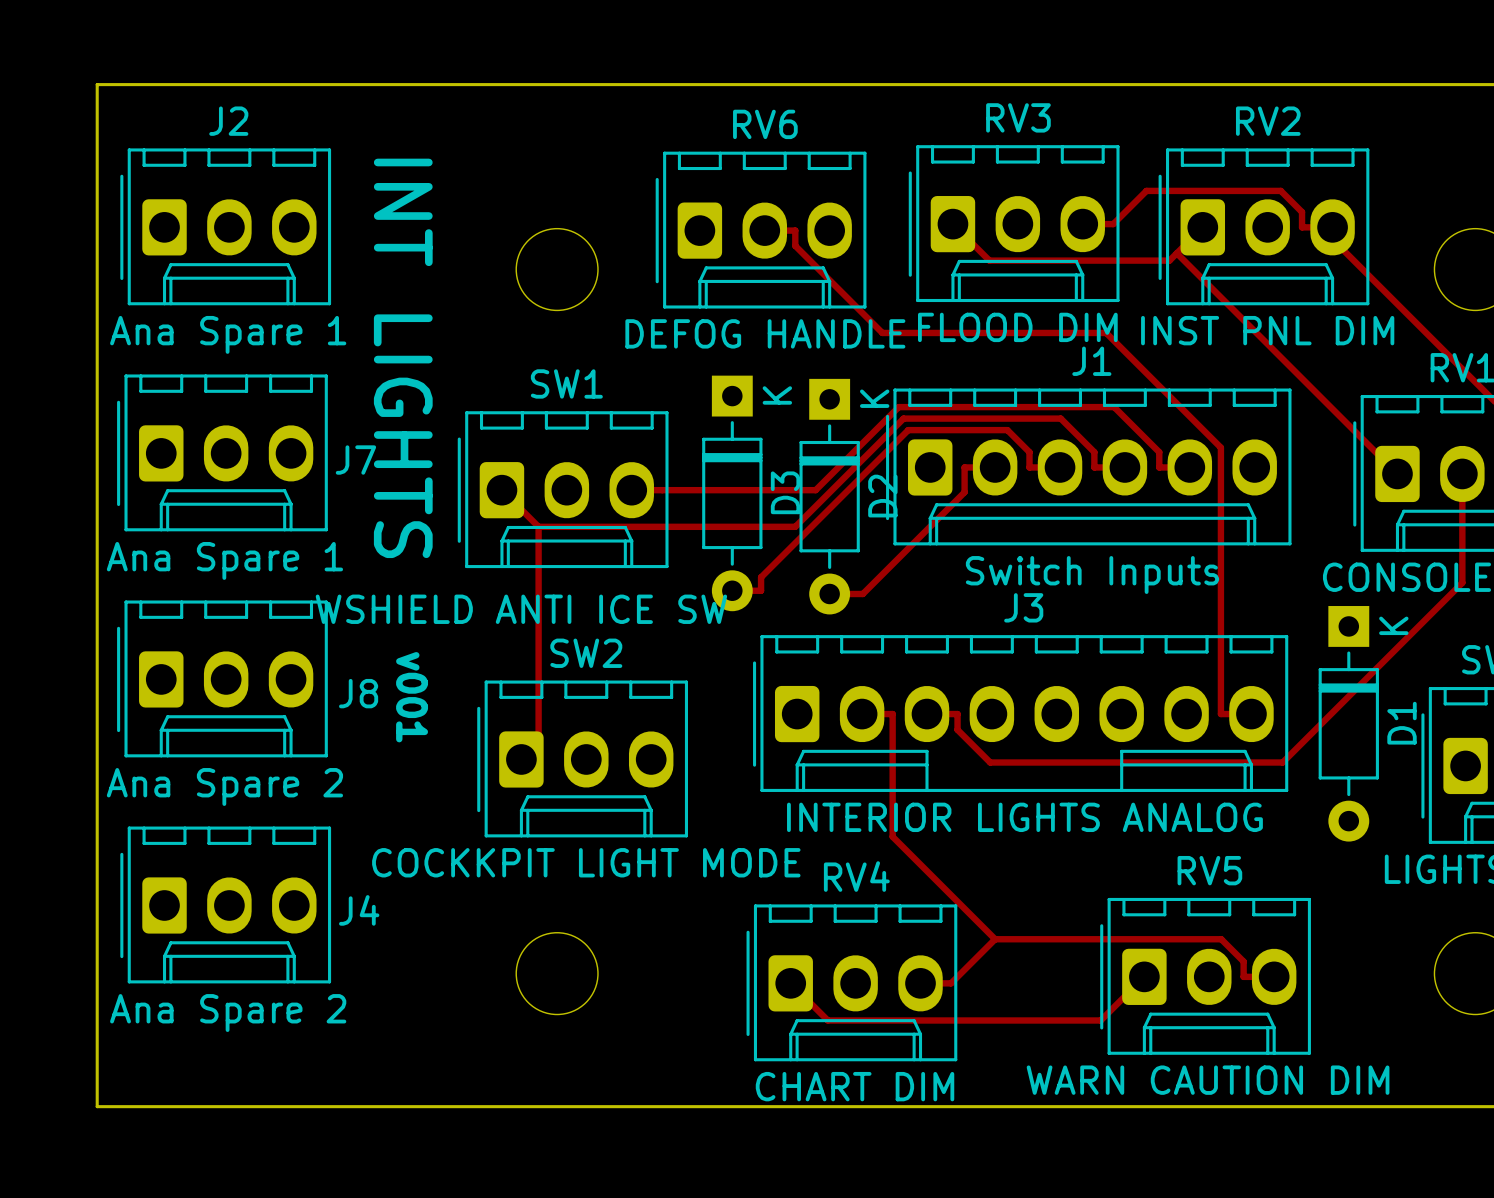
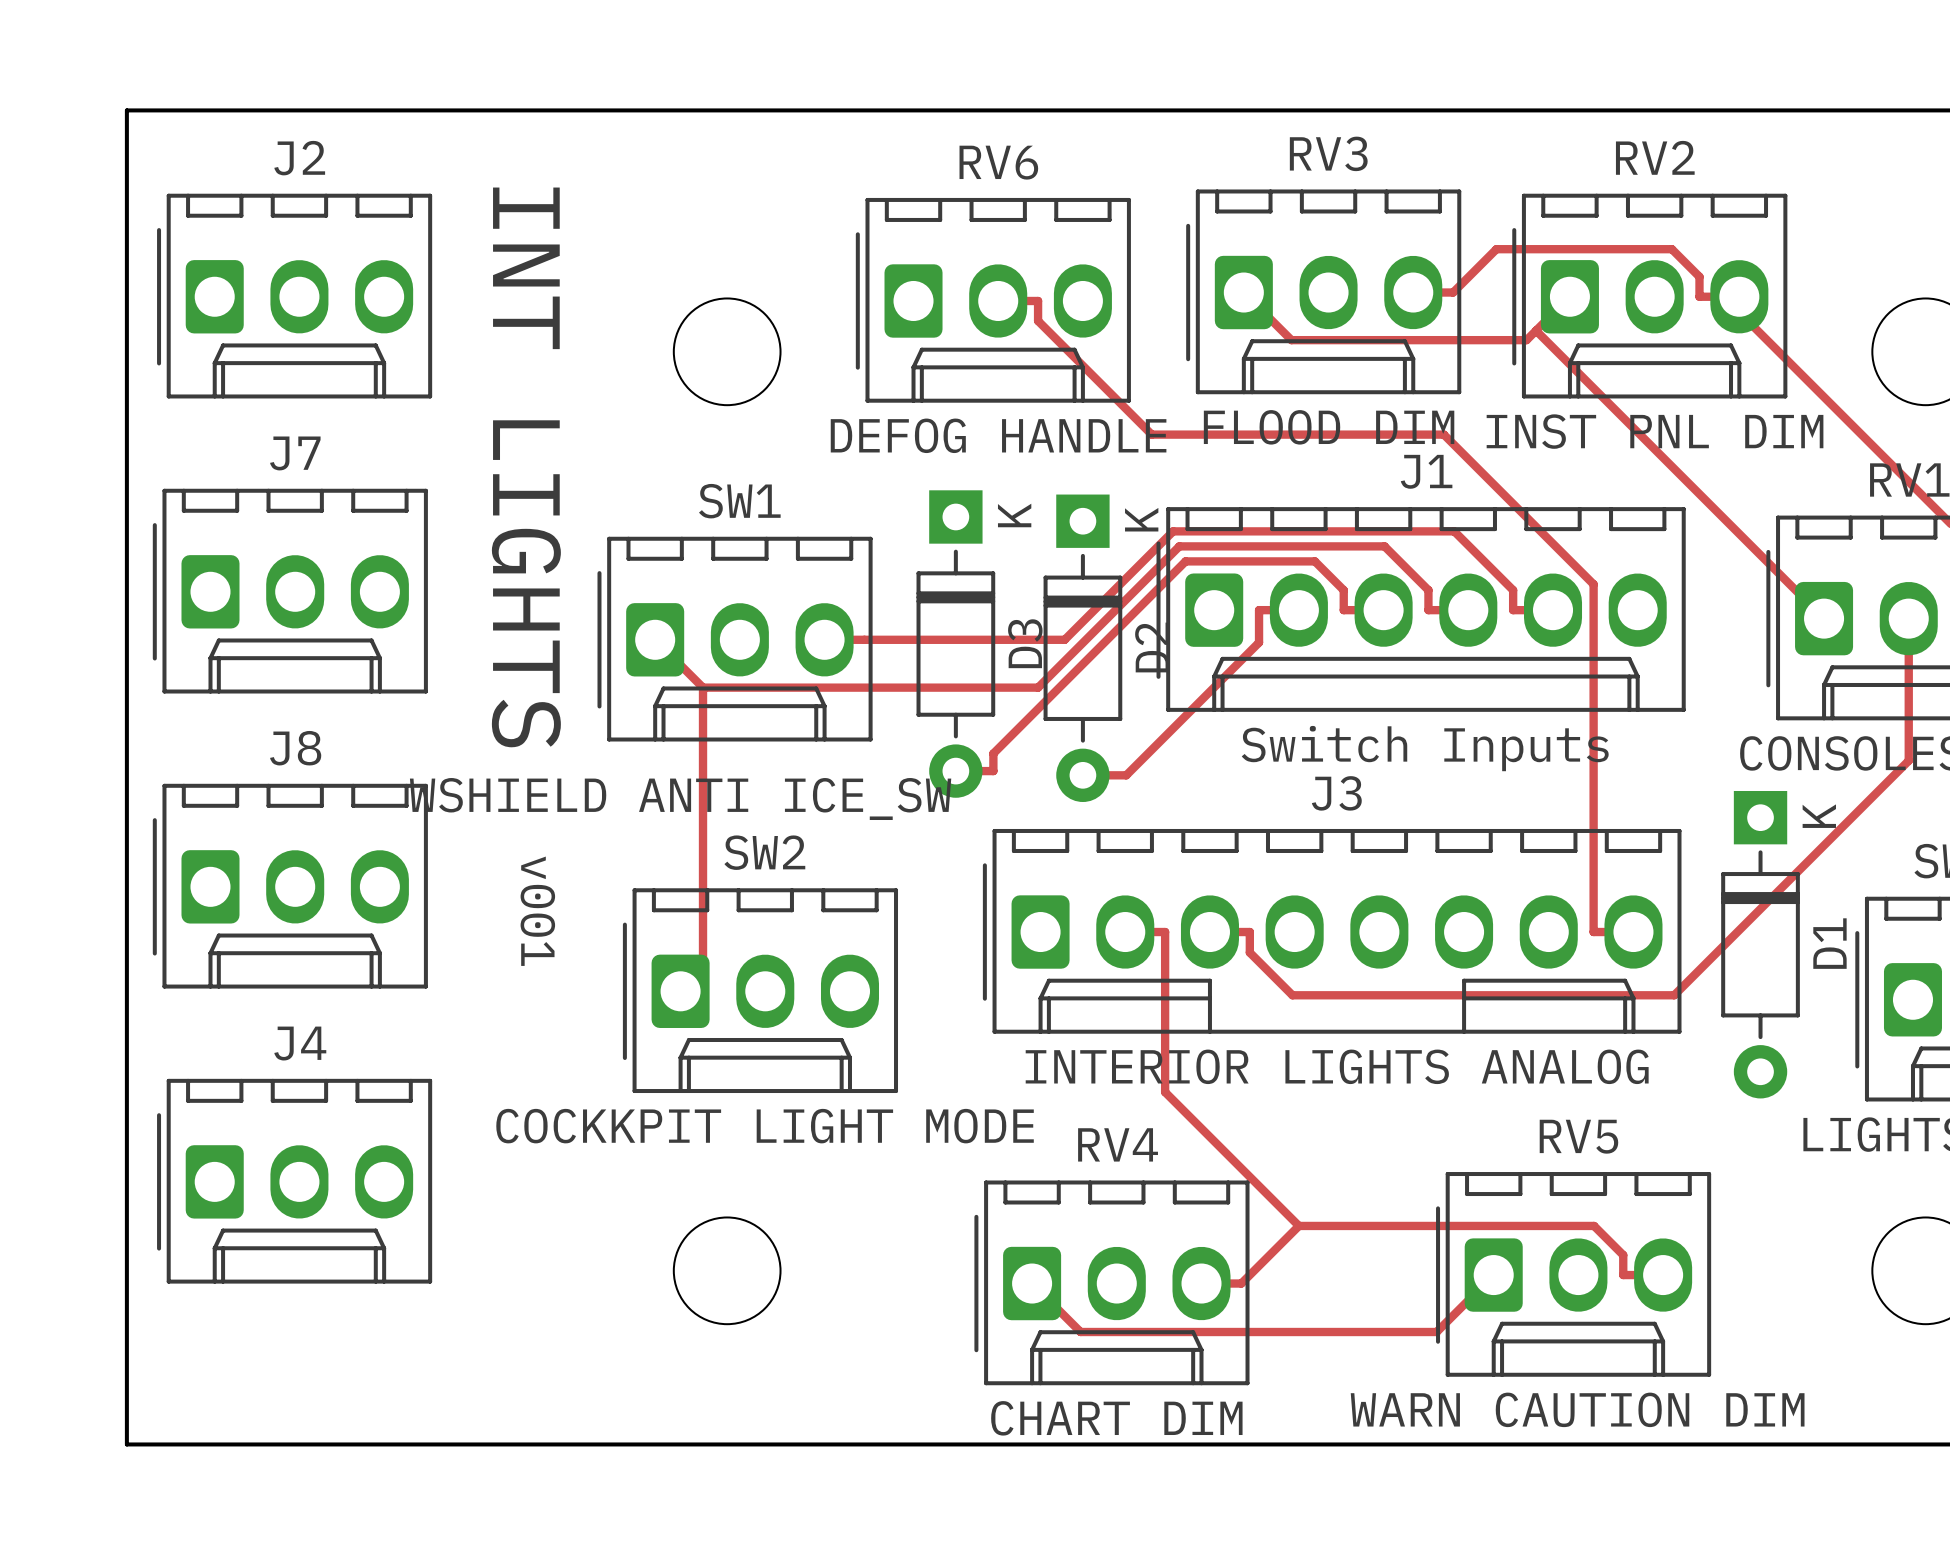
J2 value: Ana Spare 1 (228, 334) -> none
J7 name position: J7 (355, 460) -> J7 (295, 453)
J7 value: Ana Spare 1 (224, 560) -> none
SW1 value: WSHIELD ANTI ICE SW (521, 609) -> WSHIELD ANTI ICE_SW (680, 799)
J8 name position: J8 (358, 693) -> J8 (295, 748)
J8 value: Ana Spare 2 (224, 786) -> none
J4 name position: J4 (359, 910) -> J4 (300, 1043)
J4 value: Ana Spare 2 (228, 1013) -> none

